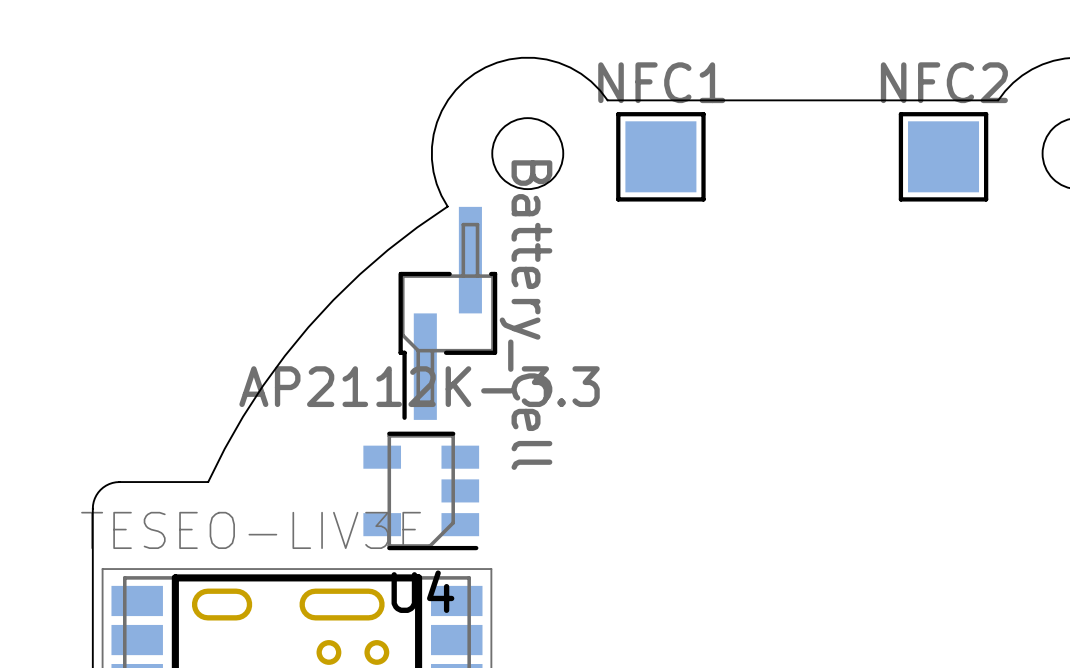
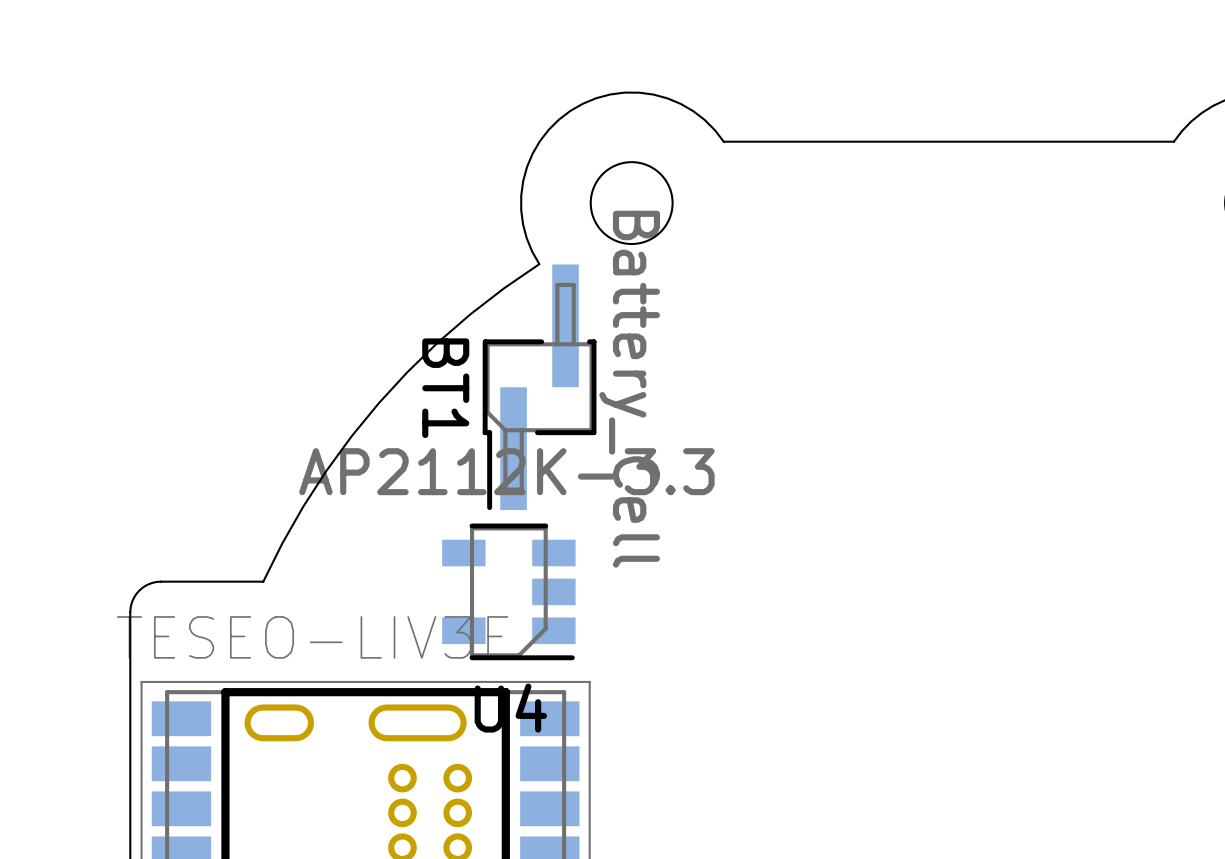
part: NFC1 (660, 156) -> none
part: NFC2 (943, 156) -> none
BT1 name: none -> BT1 (445, 388)

